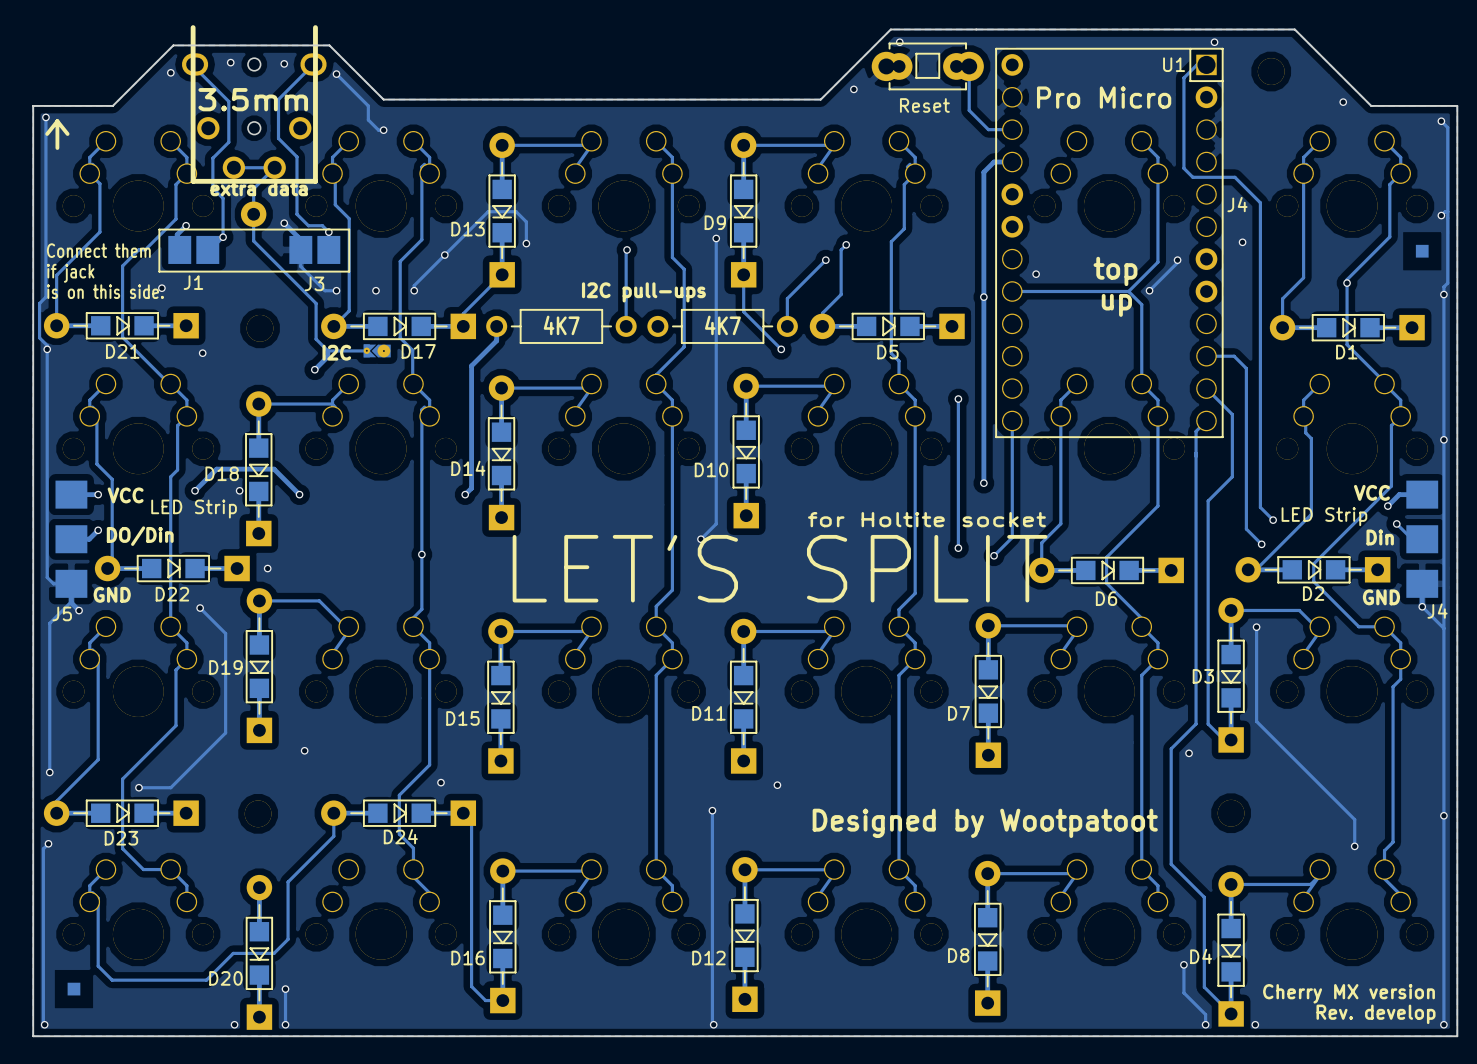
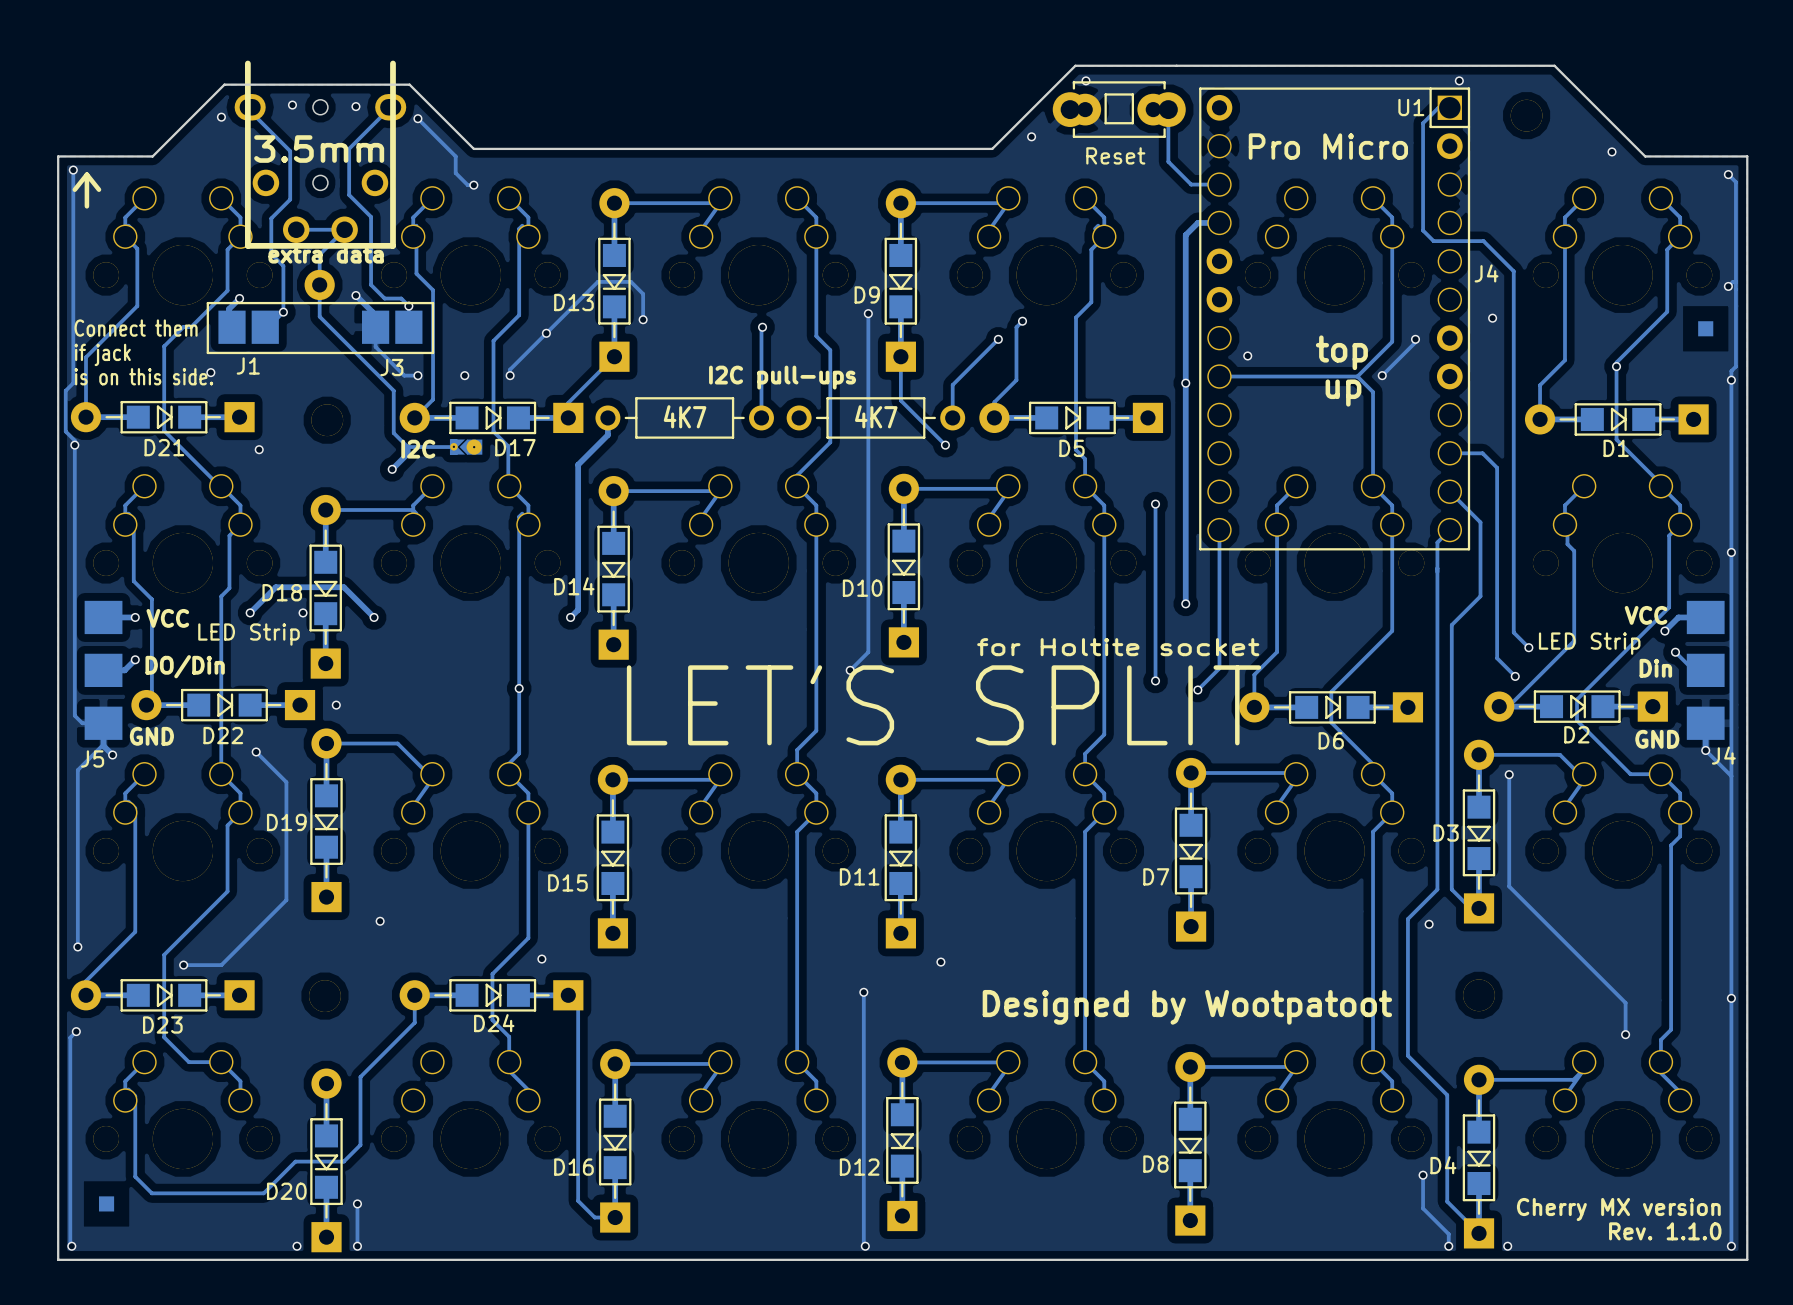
text: Rev. develop (1376, 1014) -> Rev. 1.1.0 (1665, 1231)

